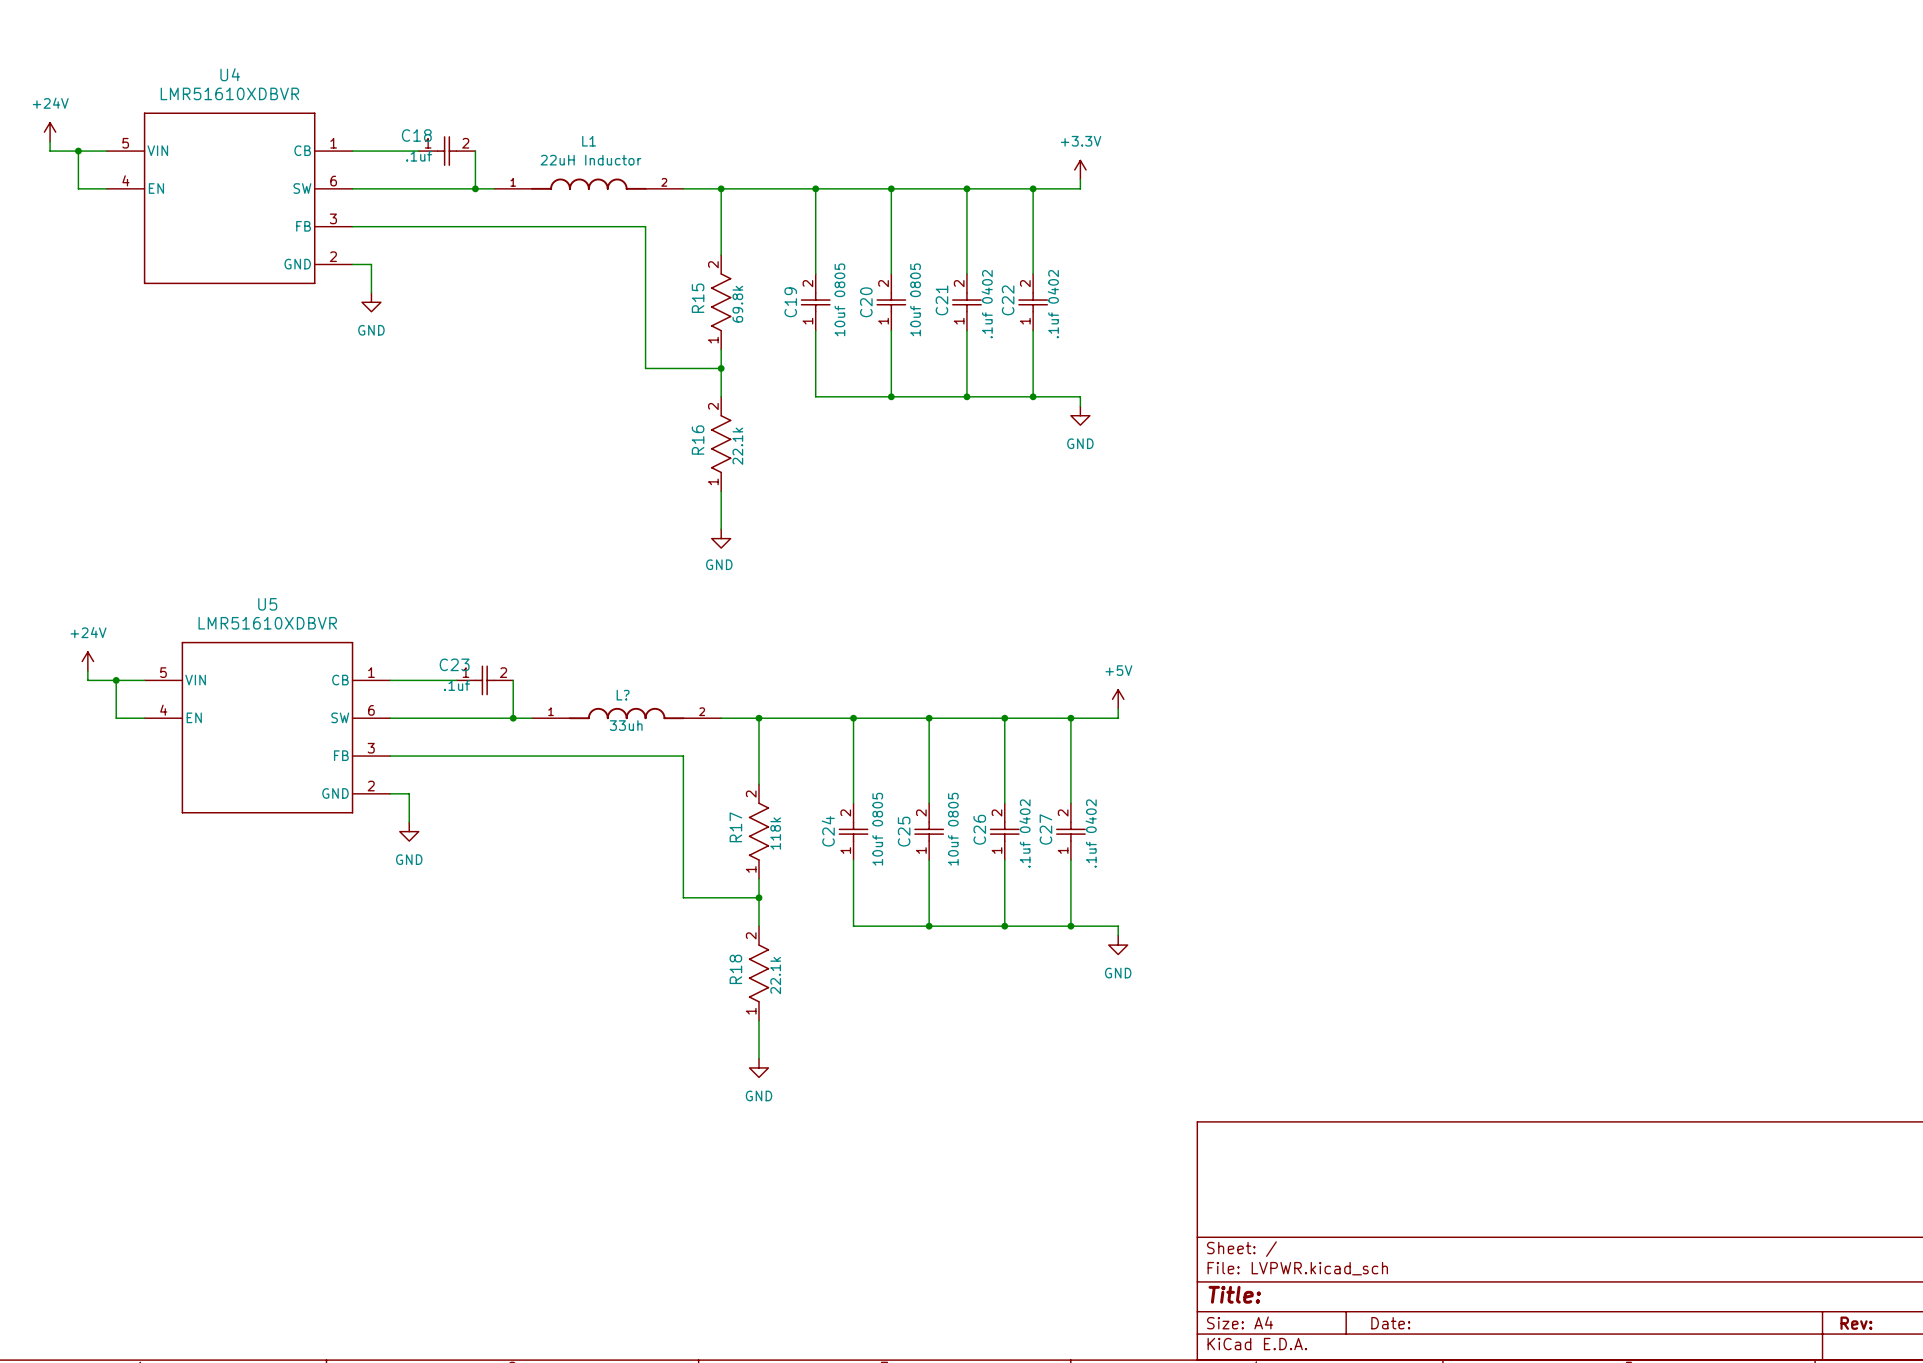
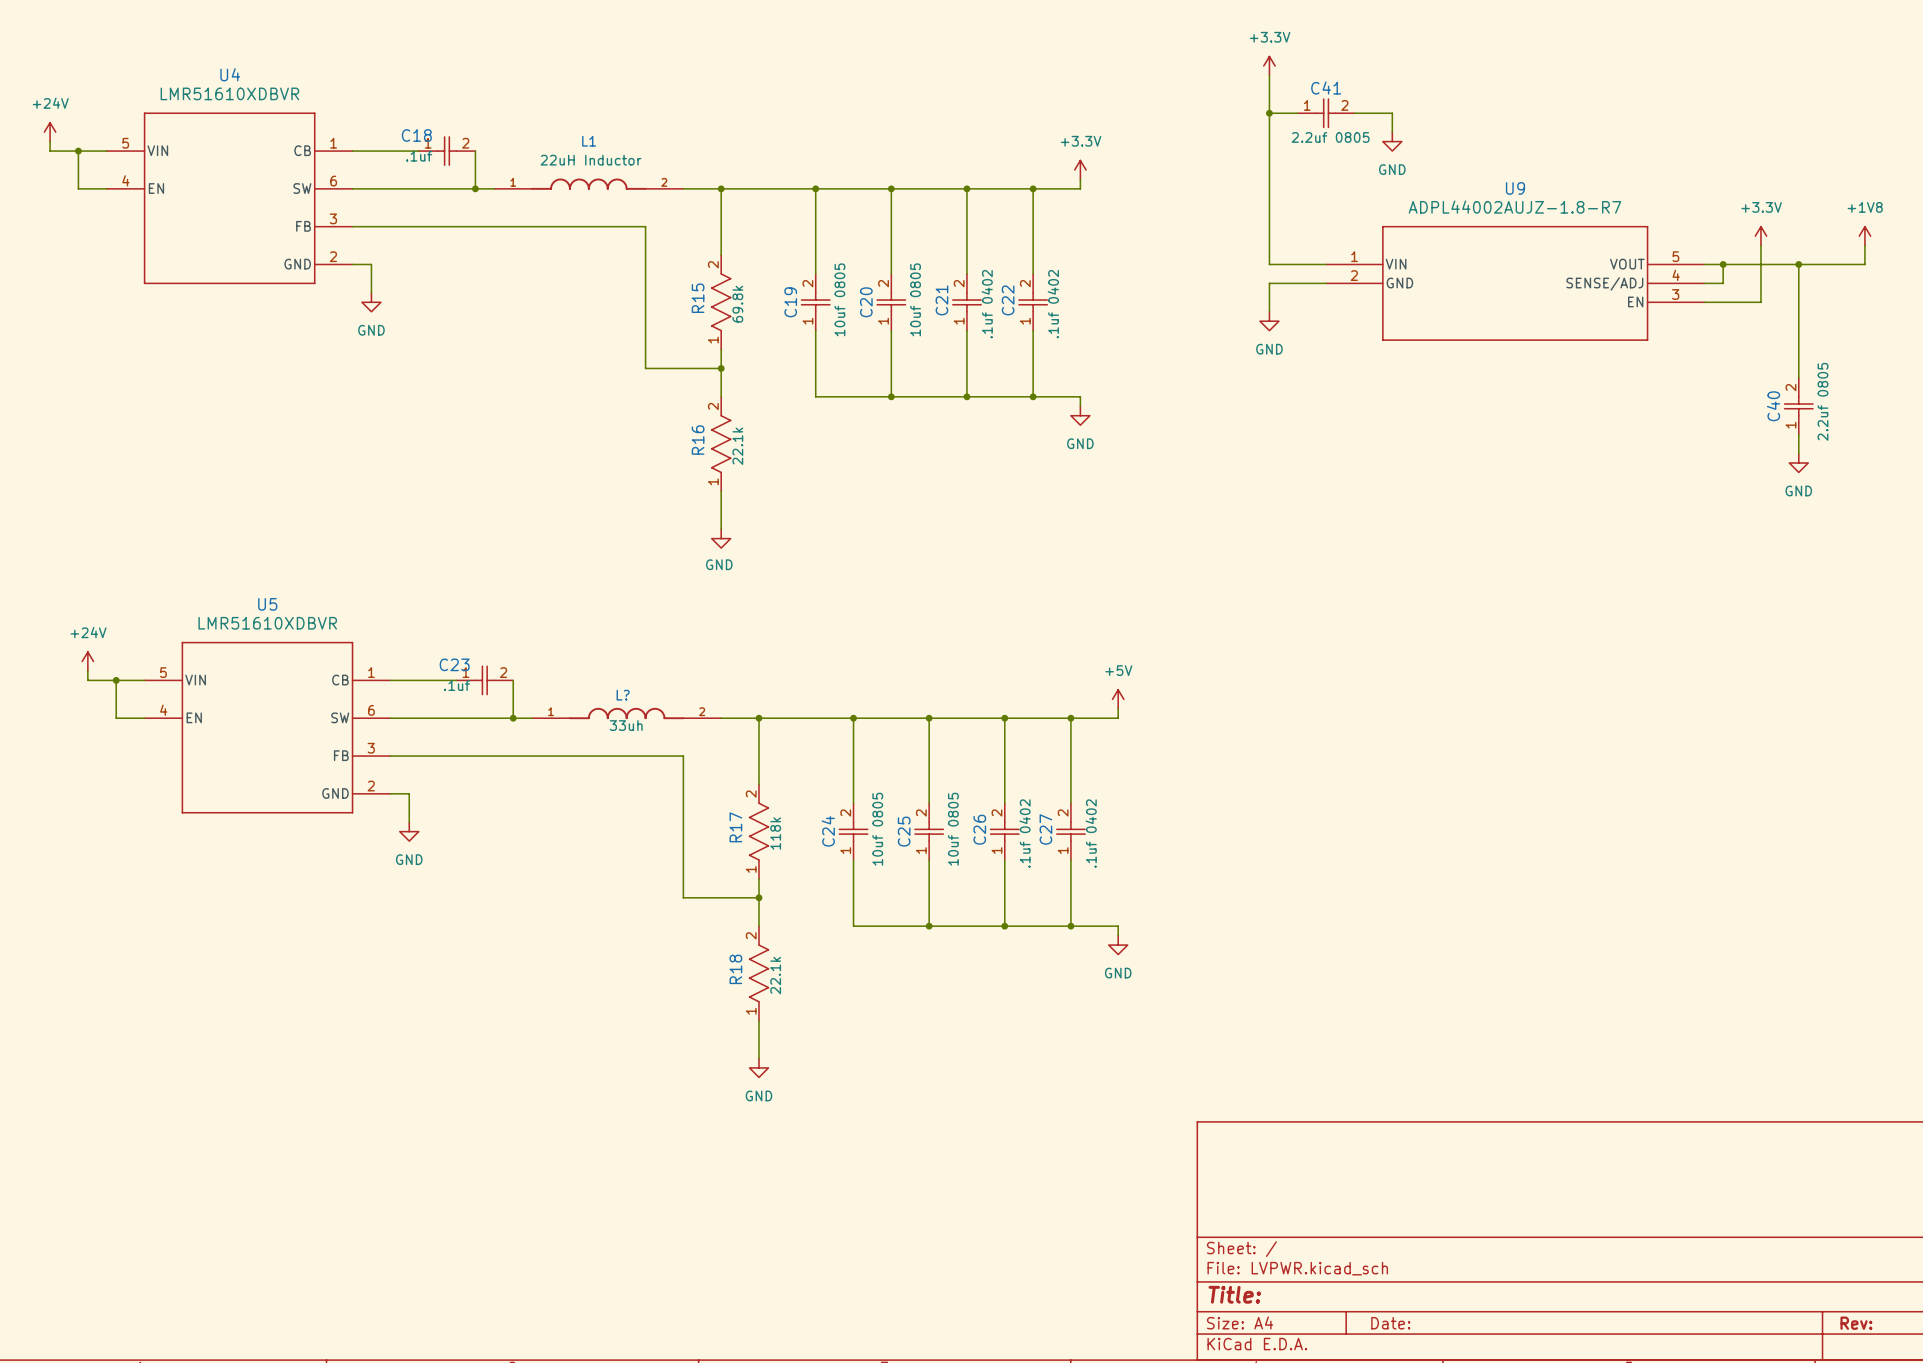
power symbol: none -> +3.3V (1269, 65)
wire: none -> (1269, 75) (1269, 264) (1326, 264)
wire: none -> (1269, 113) (1297, 113)
junction: none -> (1269, 113)
C41: none -> (1326, 113)
wire: none -> (1354, 113) (1392, 113) (1392, 132)
power symbol: none -> GND (1392, 141)
power symbol: none -> +3.3V (1760, 236)
power symbol: none -> +1V8 (1864, 236)
wire: none -> (1760, 245) (1760, 302) (1704, 302)
wire: none -> (1864, 245) (1864, 264) (1704, 264)
wire: none -> (1723, 264) (1723, 283) (1704, 283)
junction: none -> (1723, 264)
wire: none -> (1798, 264) (1798, 377)
junction: none -> (1798, 264)
wire: none -> (1326, 283) (1269, 283) (1269, 311)
U9: none -> ADPL44002AUJZ-1.8-R7 (1515, 283)
power symbol: none -> GND (1269, 321)
C40: none -> (1798, 406)
wire: none -> (1798, 434) (1798, 453)
power symbol: none -> GND (1798, 462)

